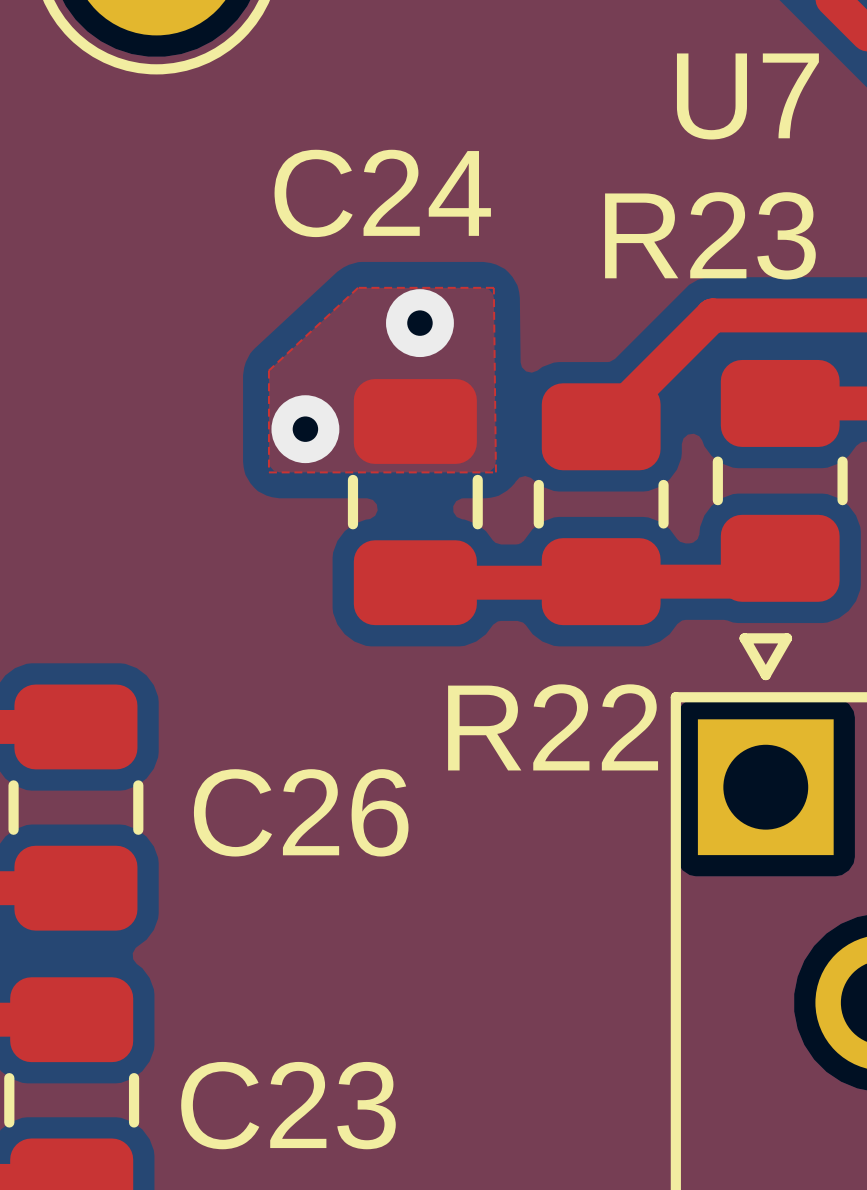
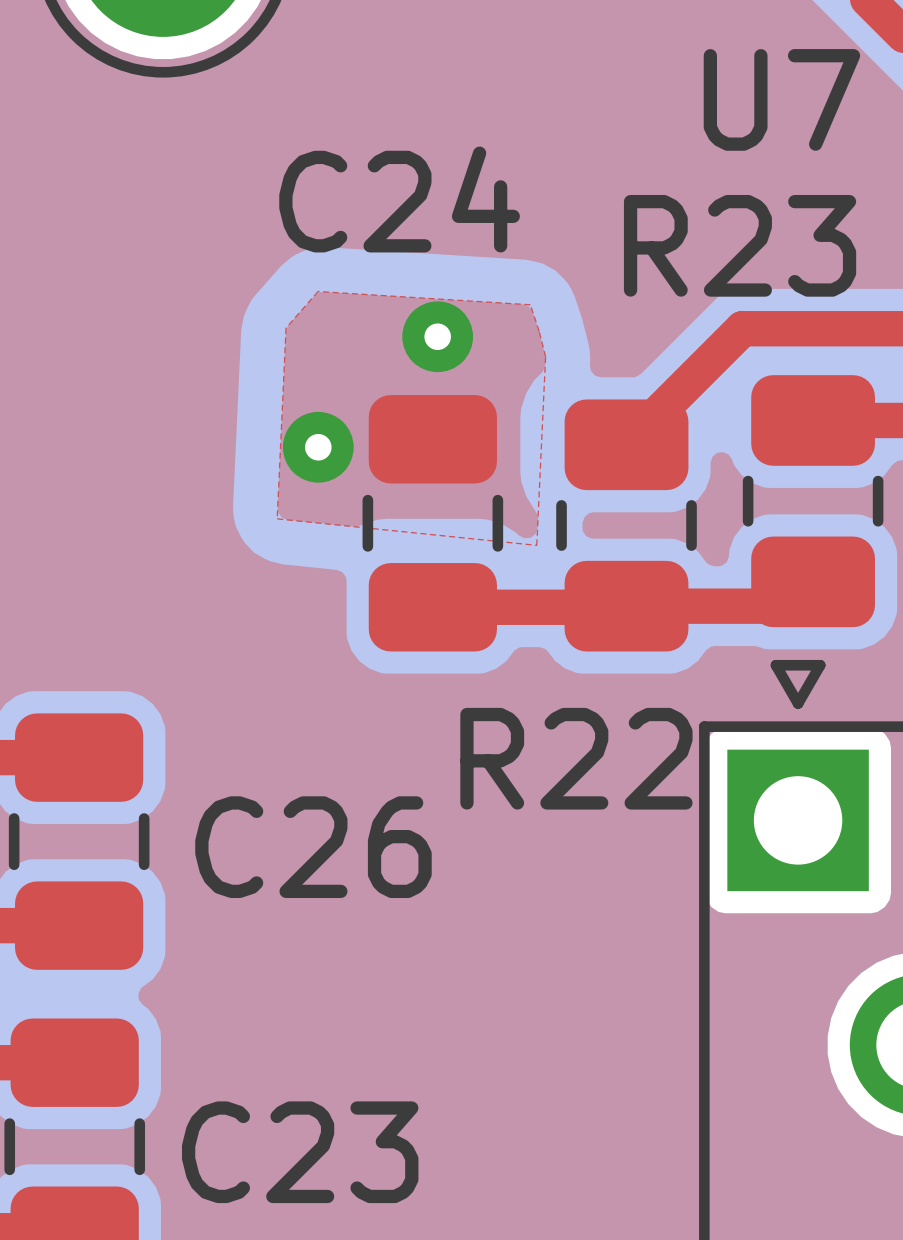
top zone outline: (358, 287) (493, 287) (495, 472) (268, 472) (268, 370) (358, 287) -> (318, 291) (286, 328) (277, 518) (536, 545) (545, 356) (530, 304) (318, 291)

